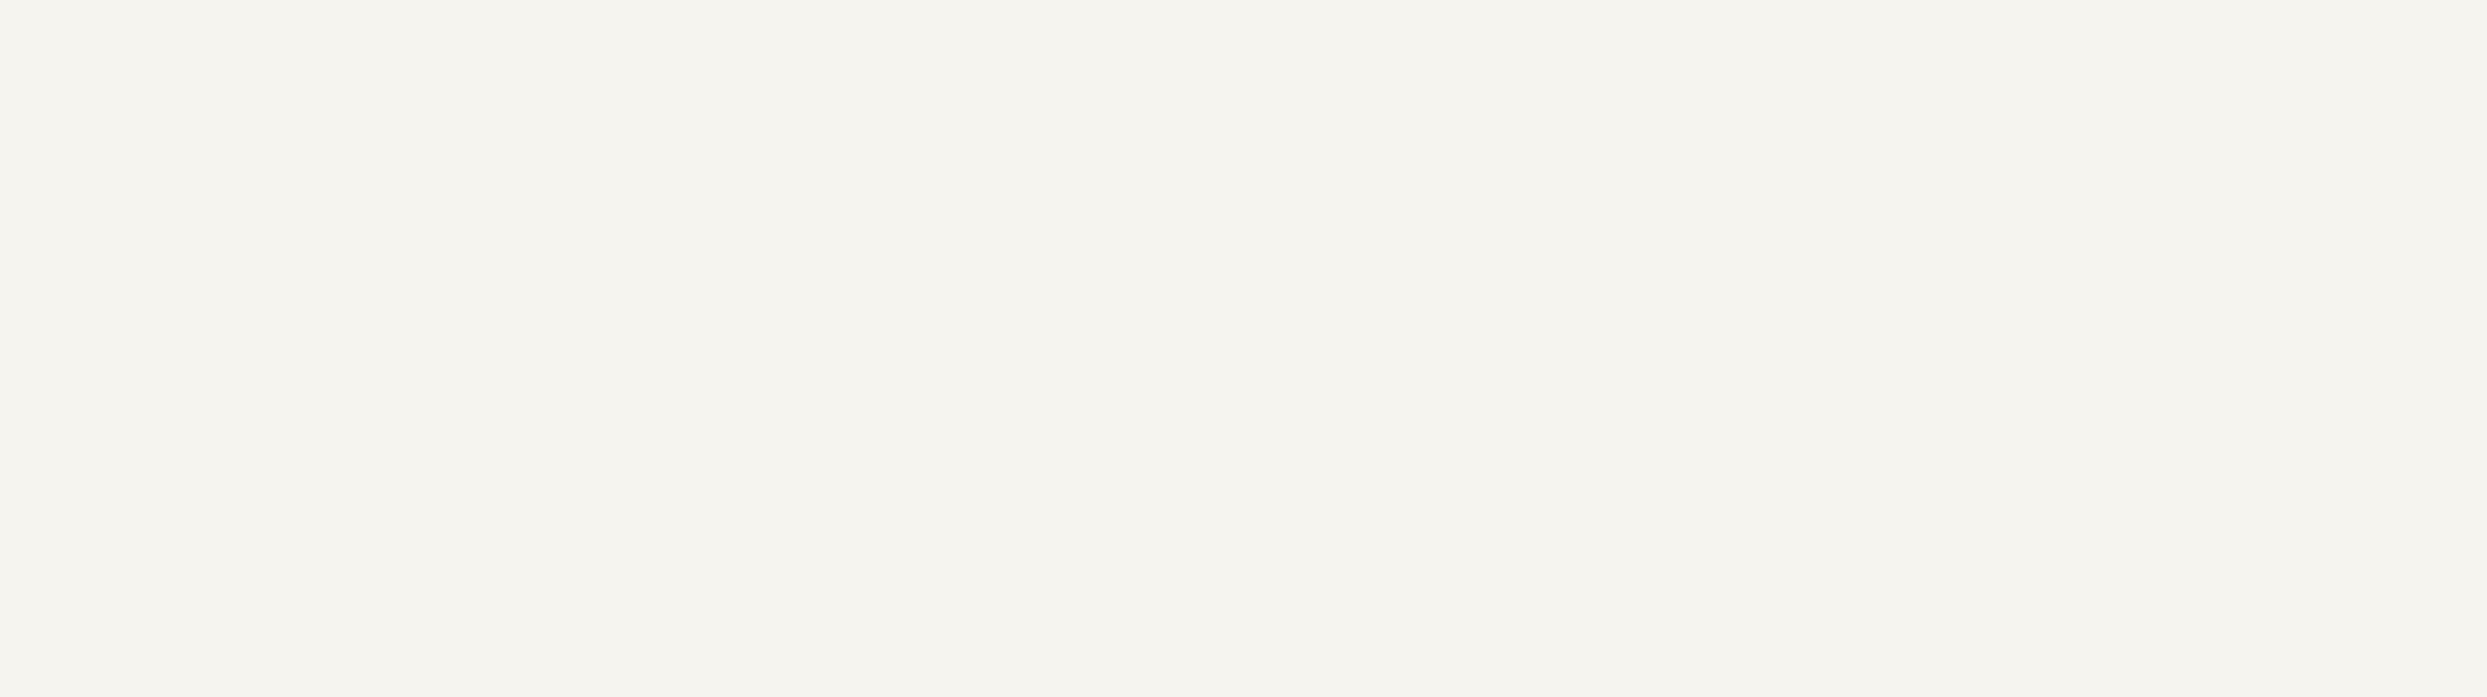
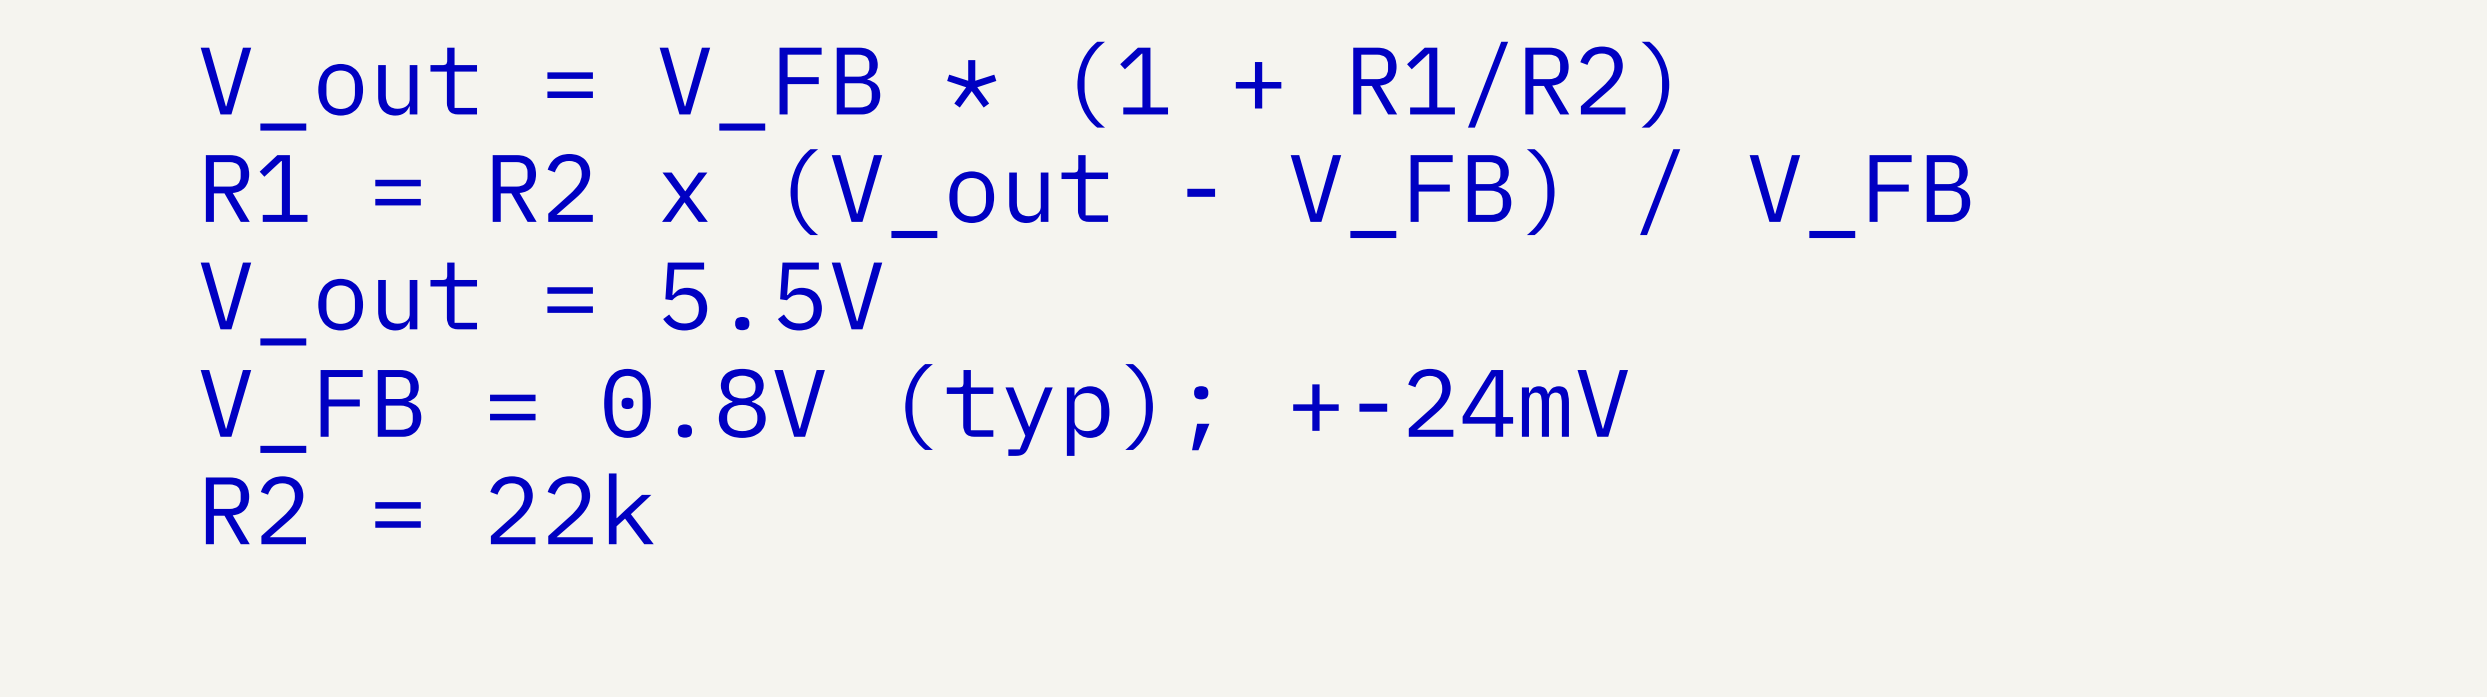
text: none -> V_out = V_FB * (1 + R1/R2) (934, 86)
text: none -> R1 = R2 x (V_out - V_FB) / V_FB (1088, 193)
text: none -> V_out = 5.5V (541, 304)
text: none -> V_FB = 0.8V (typ); +-24mV (914, 409)
text: none -> R2 = 22k (429, 508)

